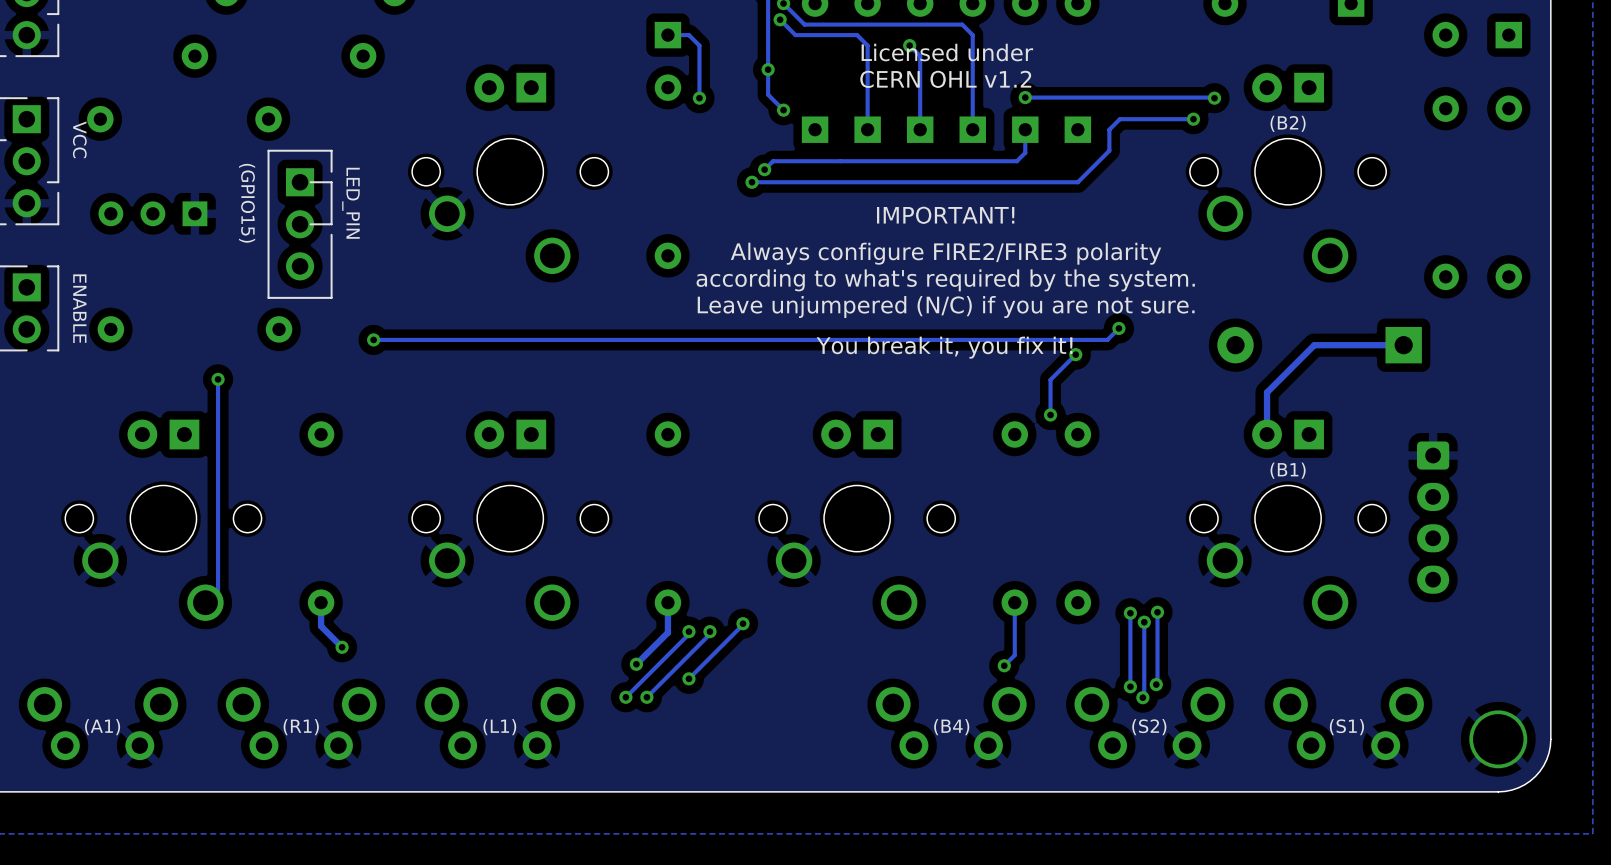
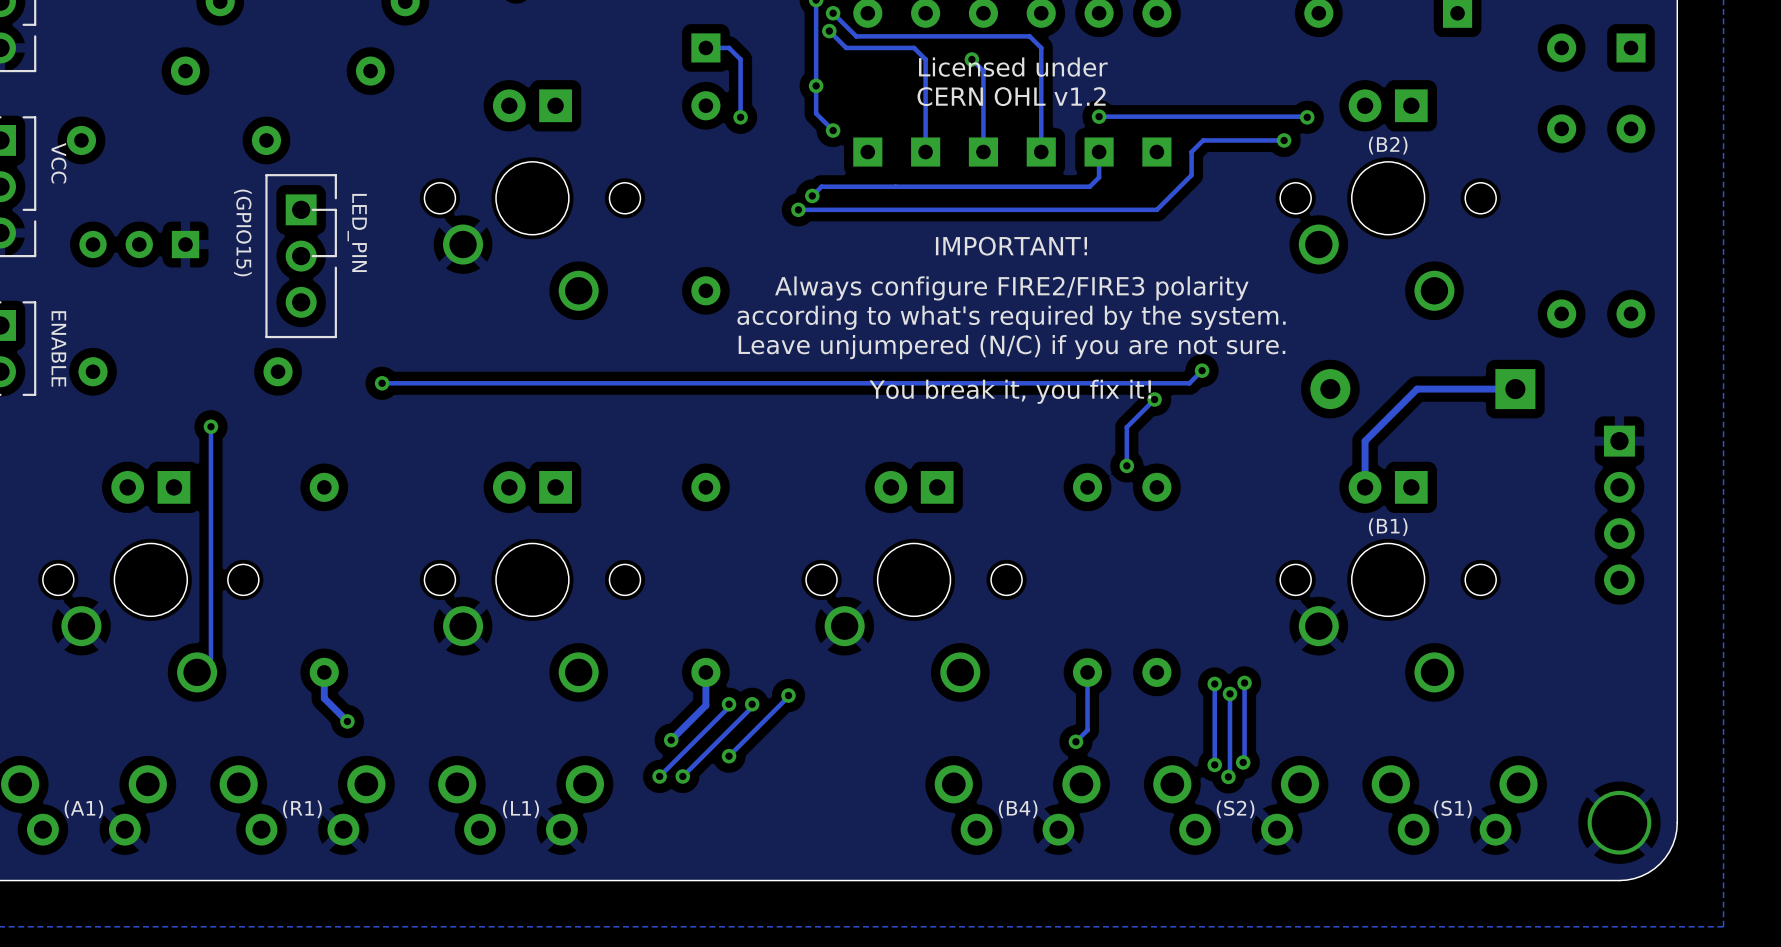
part: none -> (1619, 510)
part: (1433, 517) -> none

